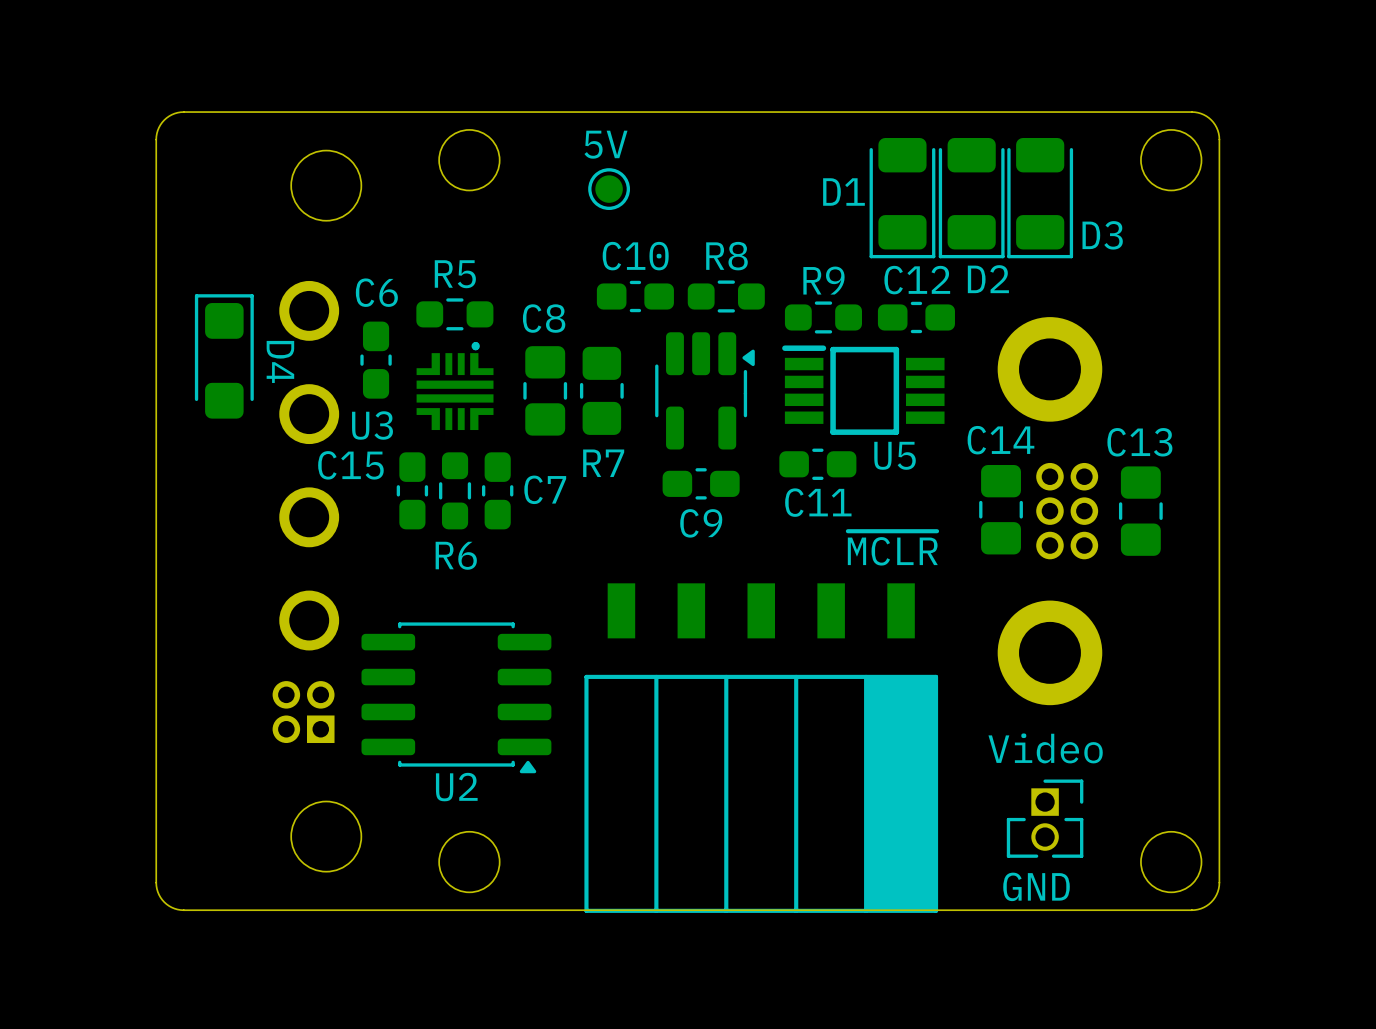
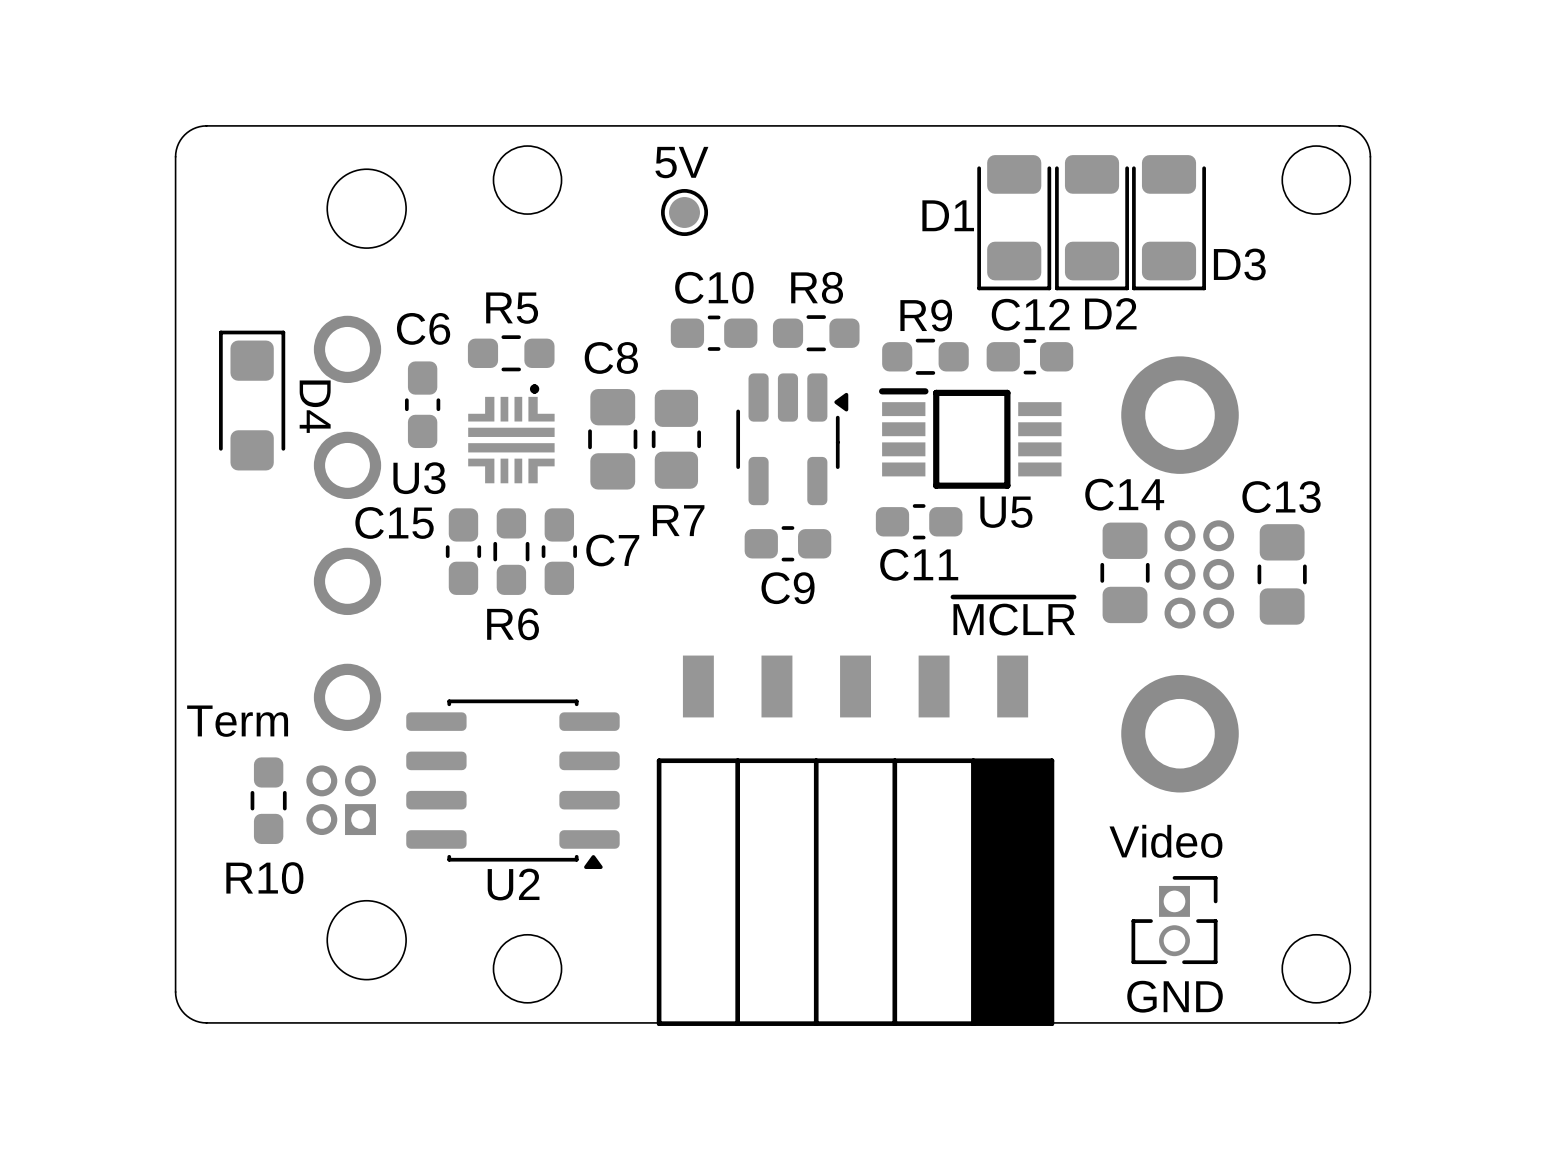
text: none -> Term (237, 721)
R10: none -> (268, 800)

